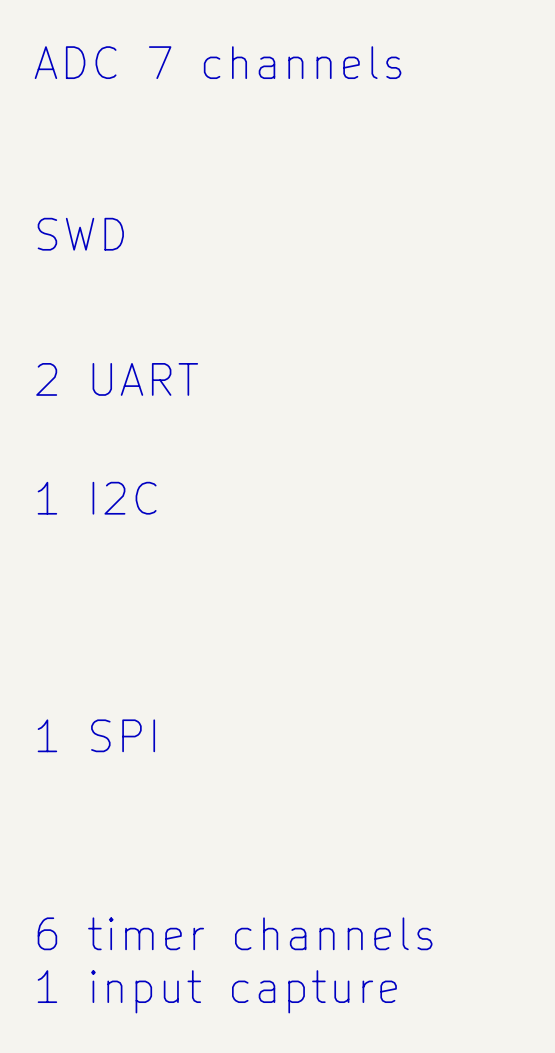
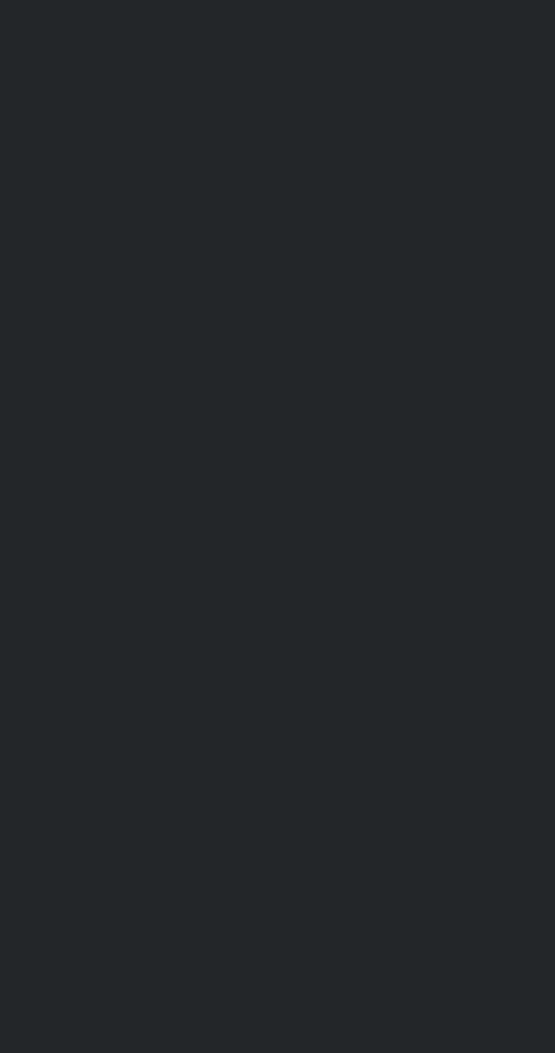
text: ADC 7 channels (218, 62) -> none
text: SWD (80, 234) -> none
text: 2 UART (117, 379) -> none
text: 1 I2C (97, 498) -> none
text: 1 SPI (96, 735) -> none
text: 6 timer channels (235, 933) -> none
text: 1 input capture (217, 991) -> none

